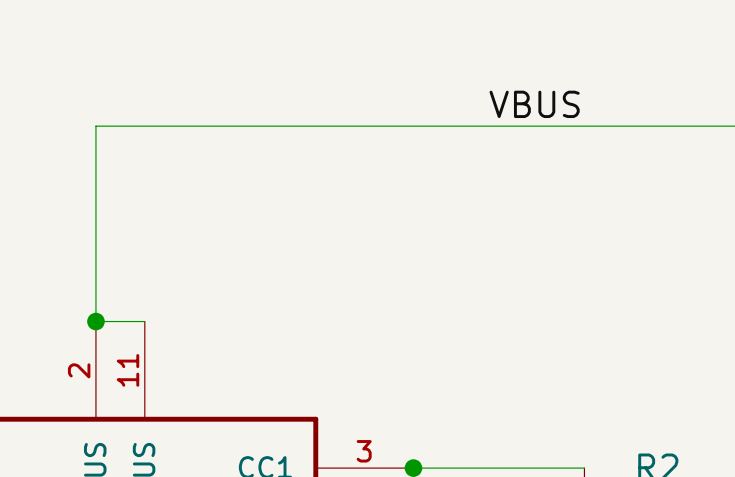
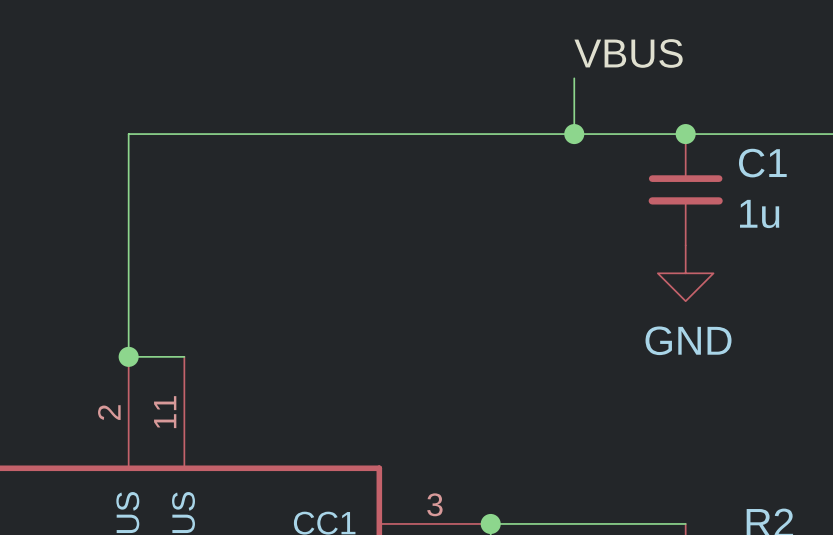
wire: none -> (574, 78) (574, 134)
label position: VBUS (534, 104) -> VBUS (628, 53)
junction: none -> (574, 134)
junction: none -> (685, 134)
C1: none -> 1u (685, 189)
power symbol: none -> GND (685, 273)

